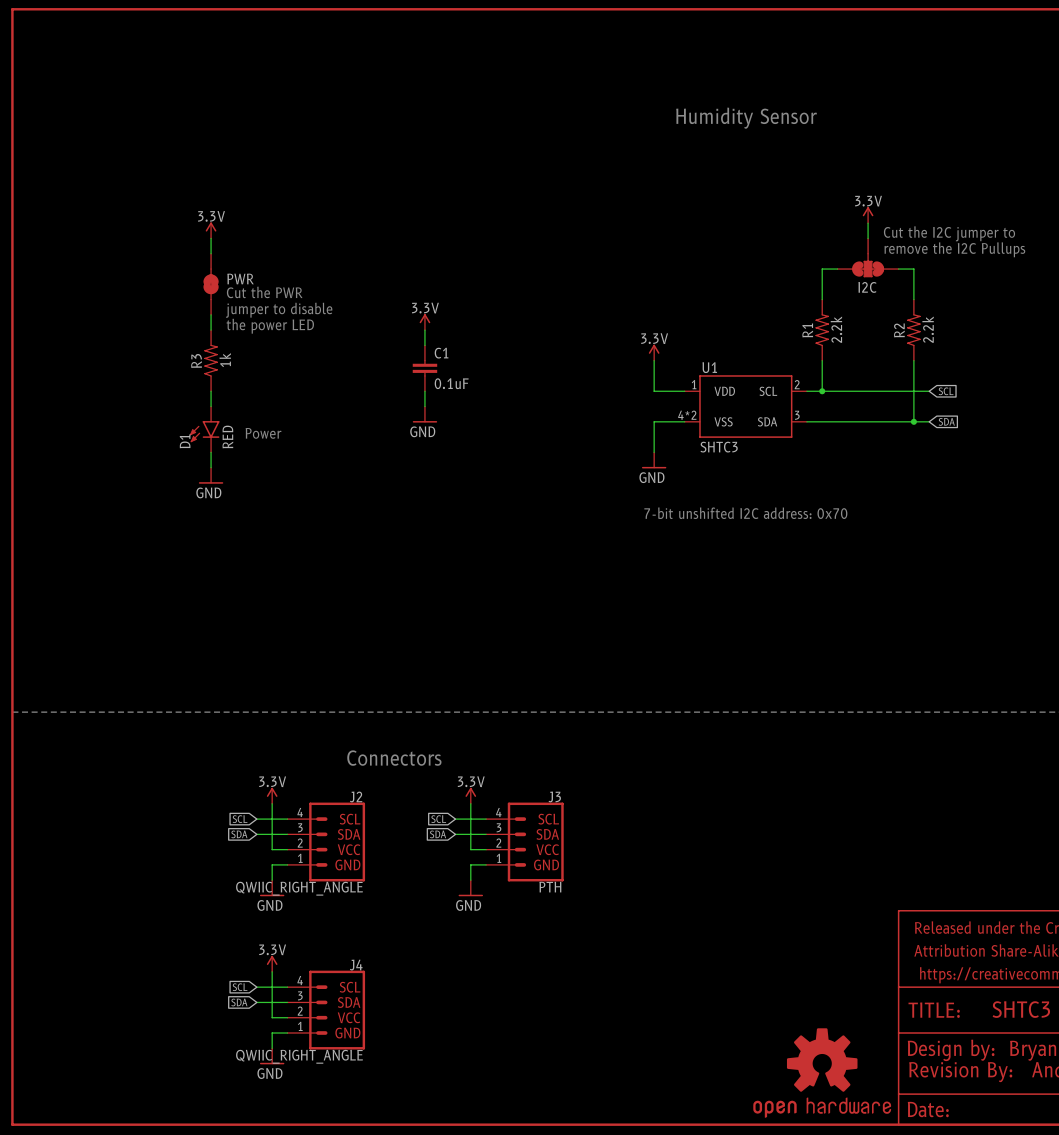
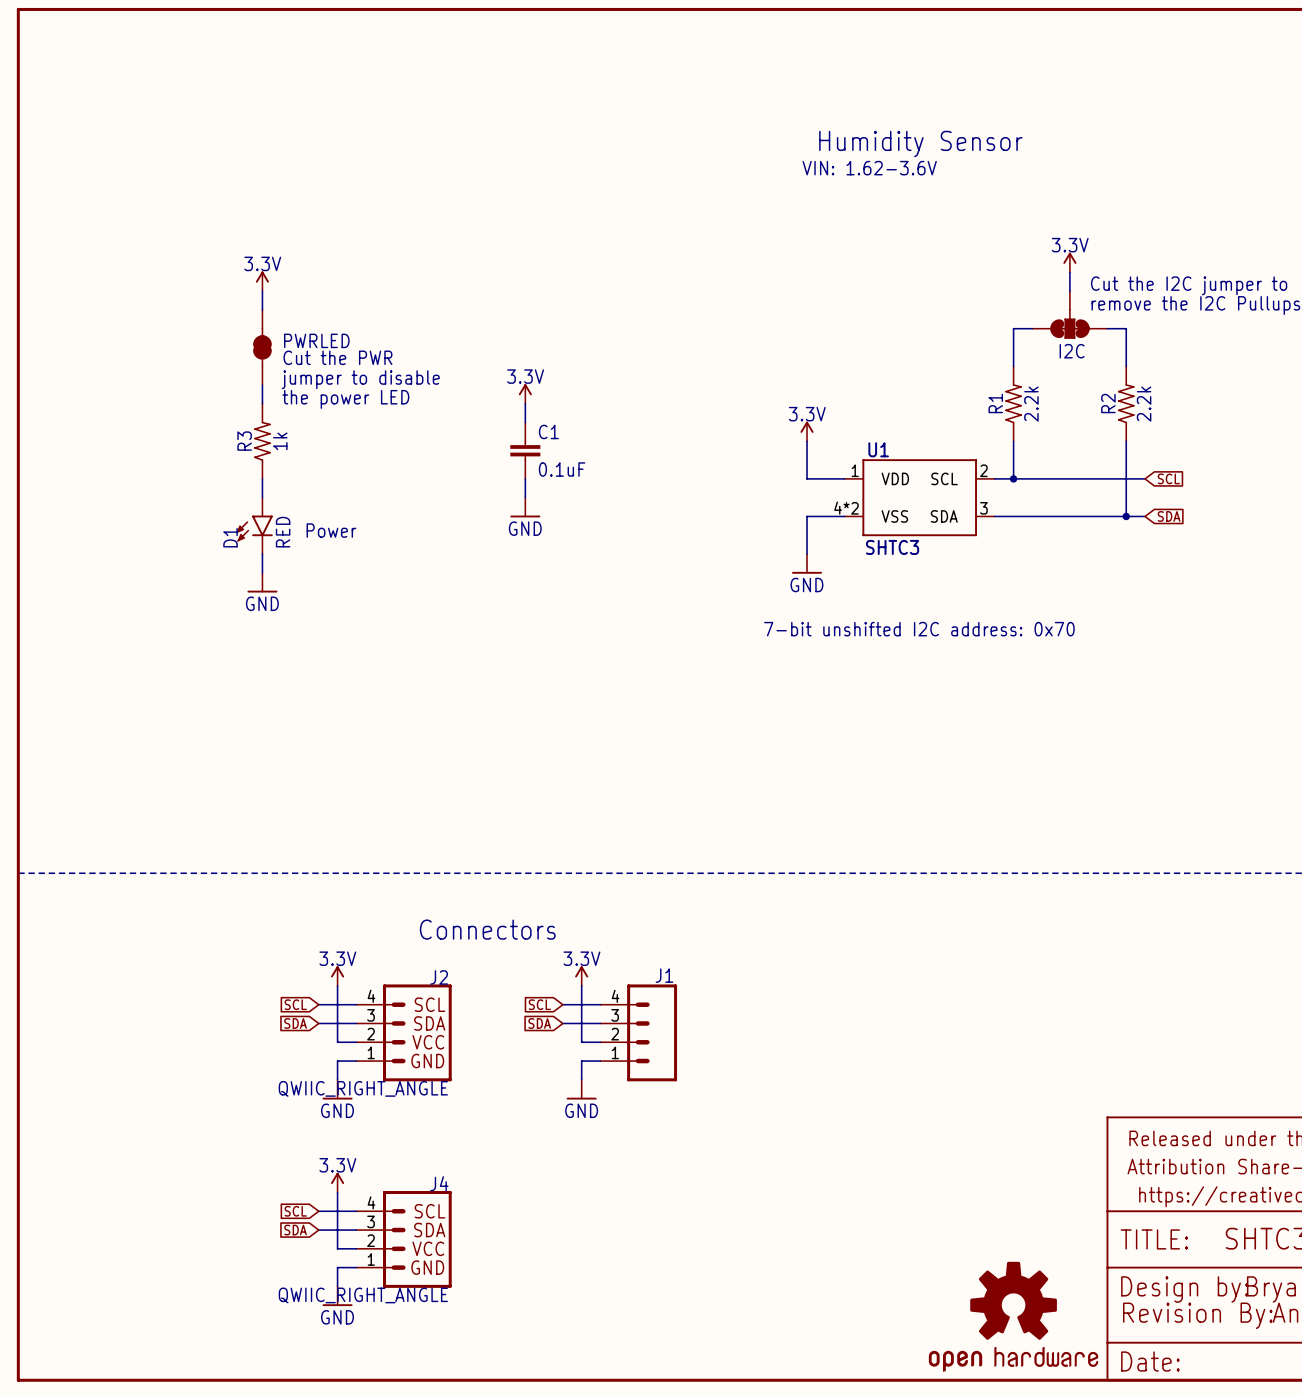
text: none -> VIN: 1.62-3.6V (869, 168)
PWR name: PWR (240, 278) -> PWRLED (316, 340)
J1: none -> (638, 1032)
J3: PTH (524, 842) -> none

